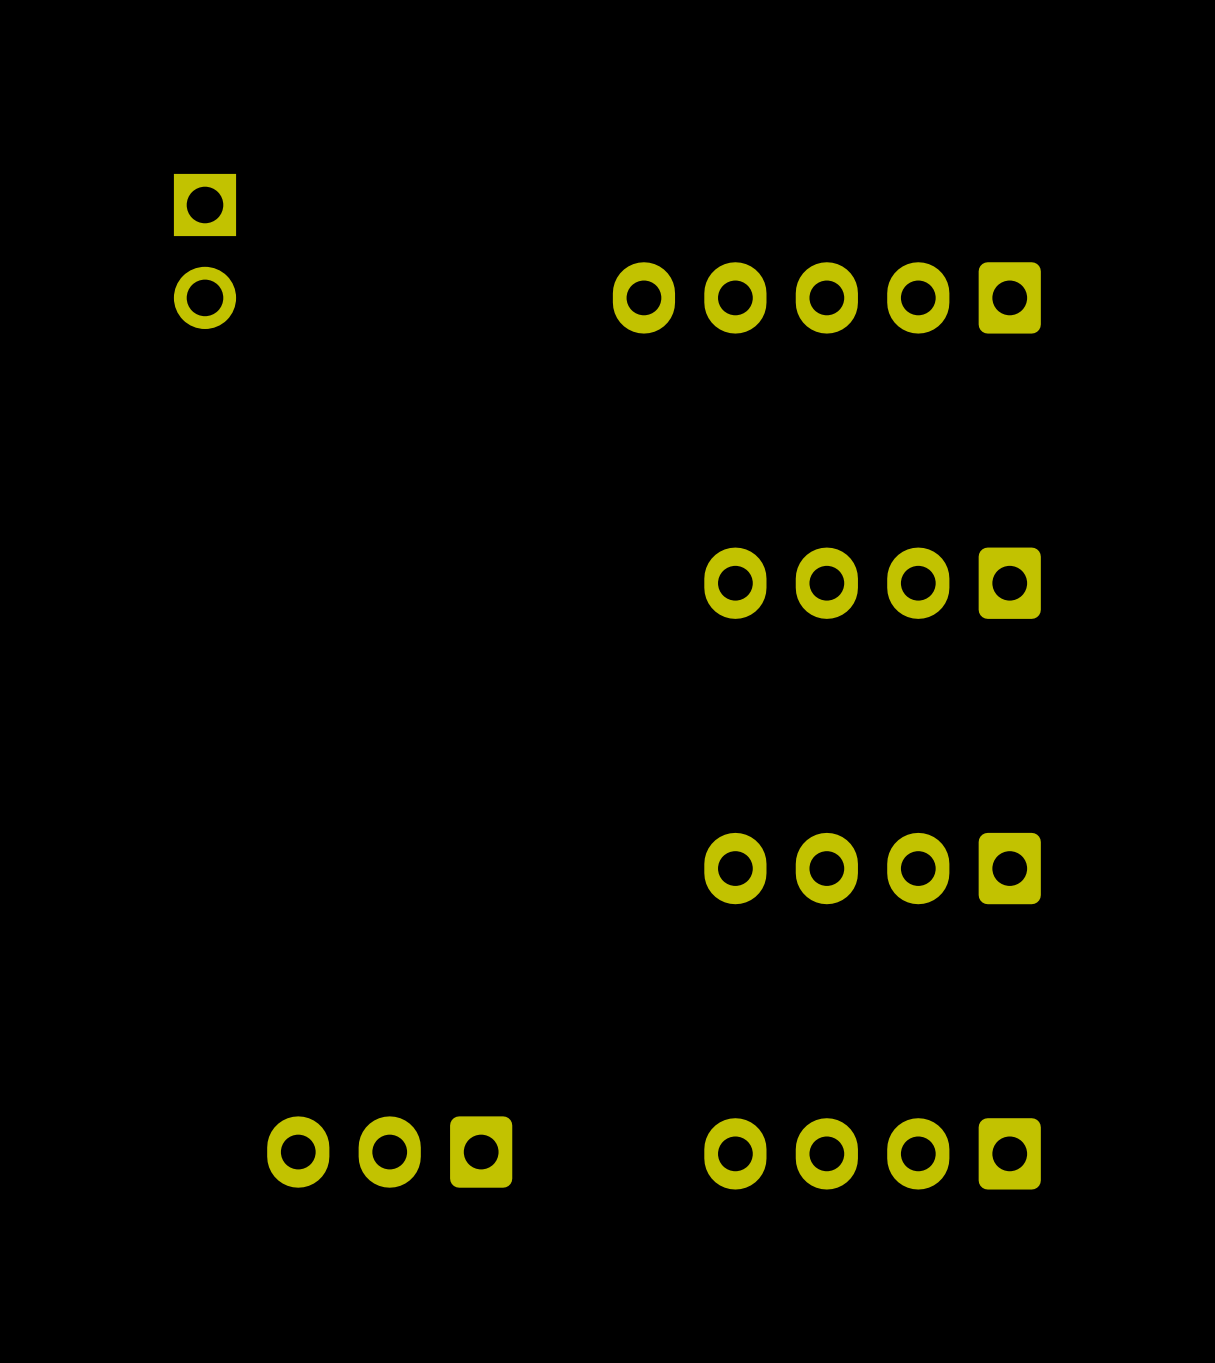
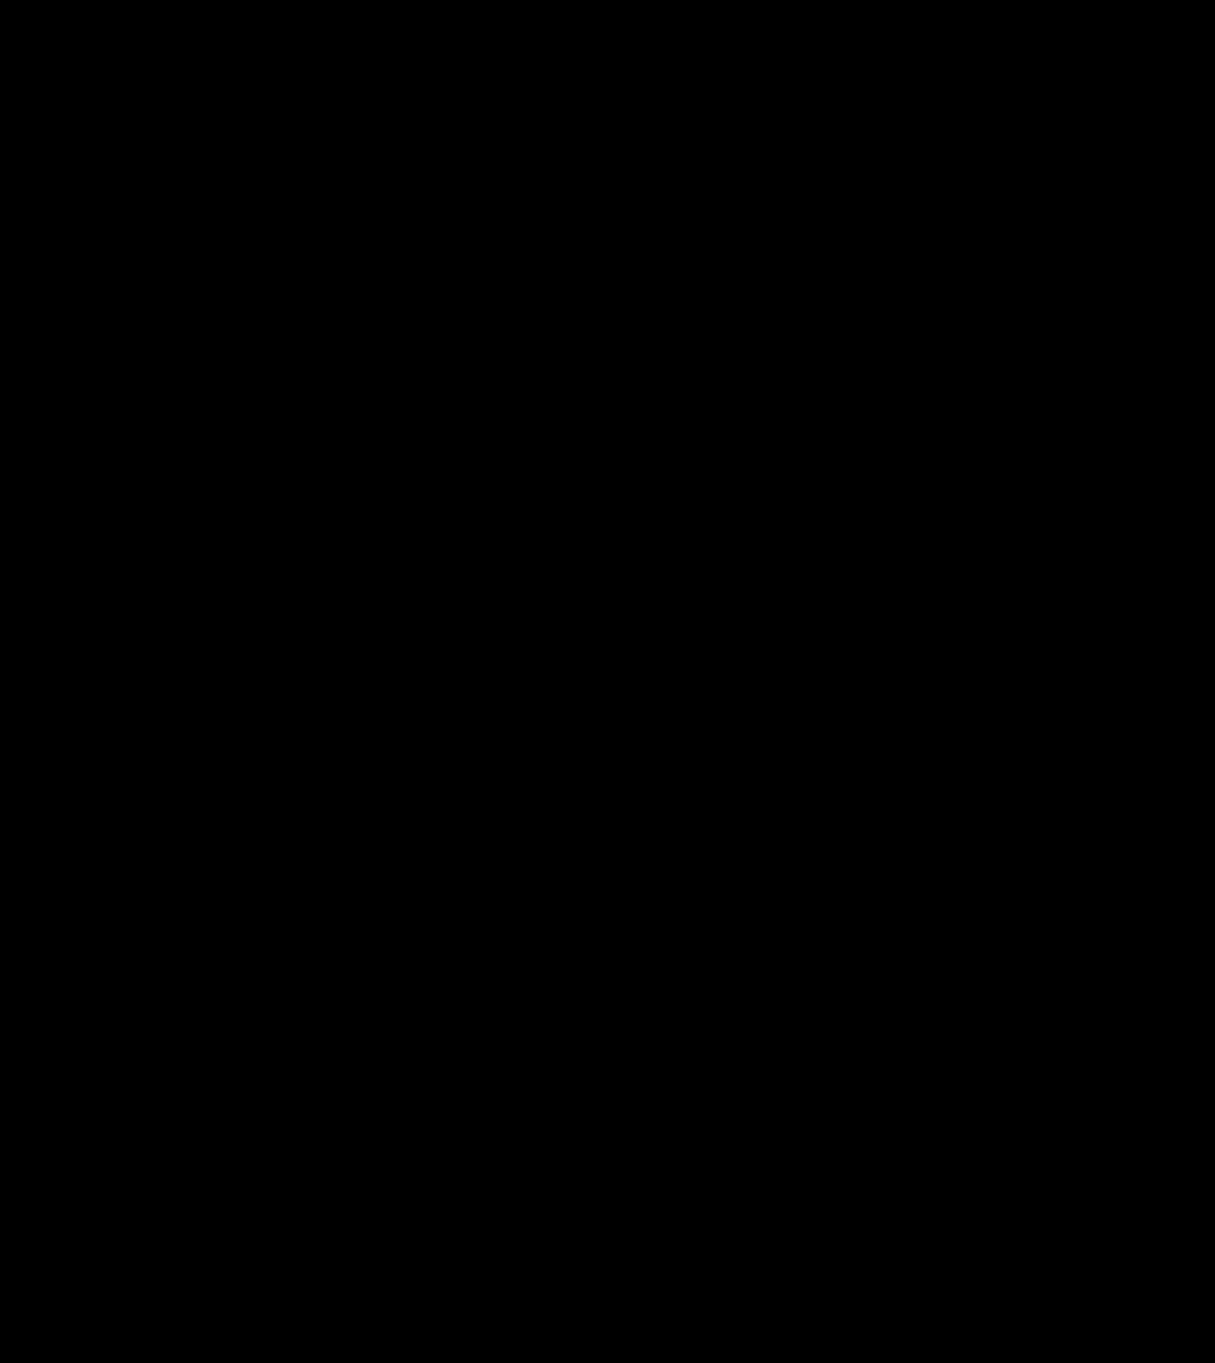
part: (204, 251) -> none
part: (826, 297) -> none
part: (872, 583) -> none
part: (872, 868) -> none
part: (389, 1152) -> none
part: (872, 1153) -> none

